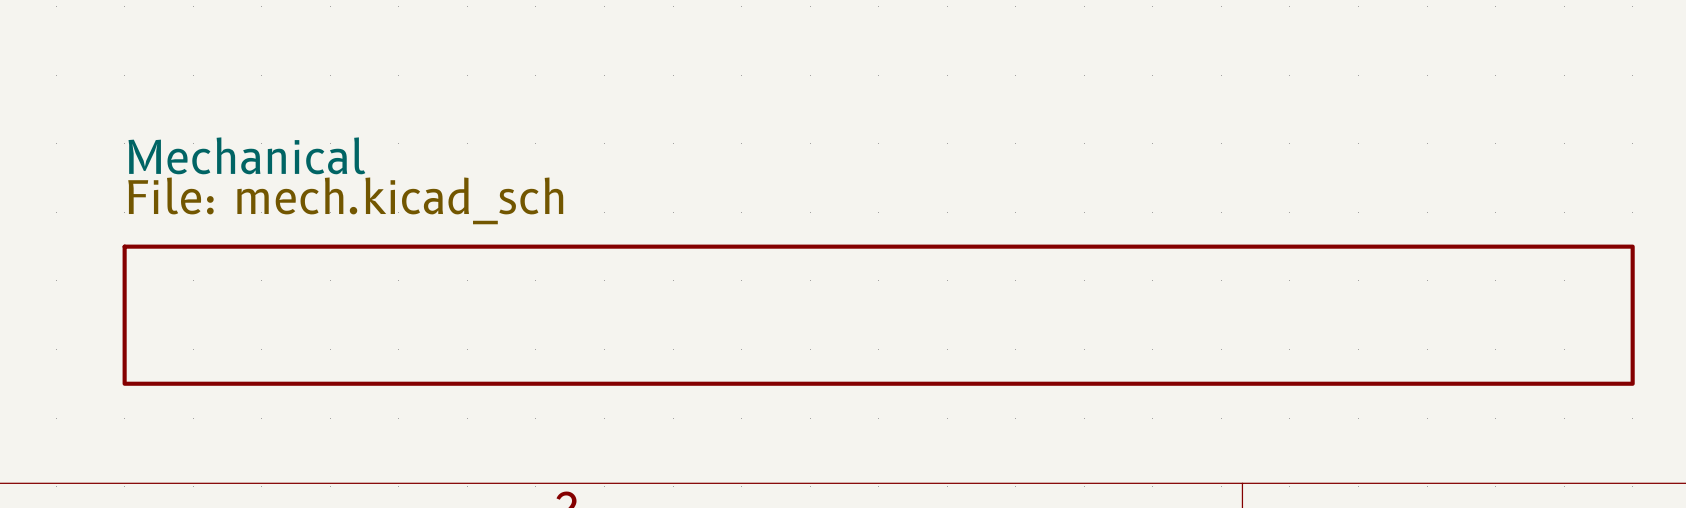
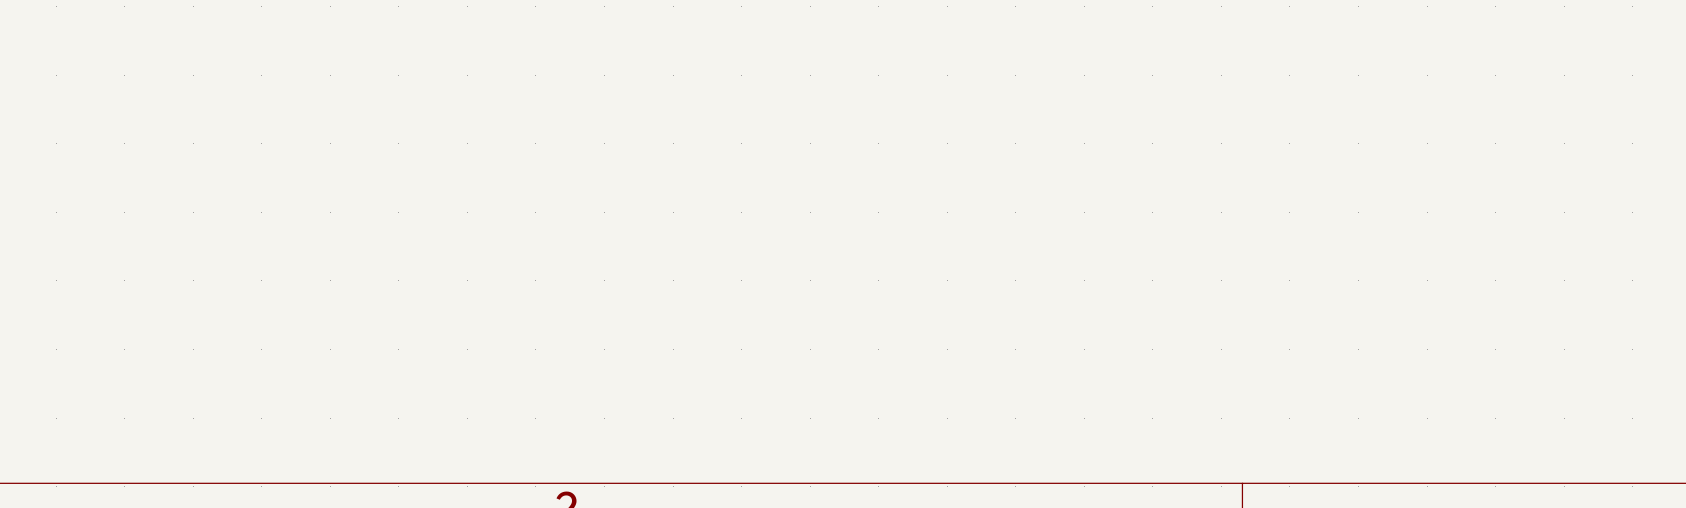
sheet Mechanical: File: mech.kicad_sch (878, 315) -> none

